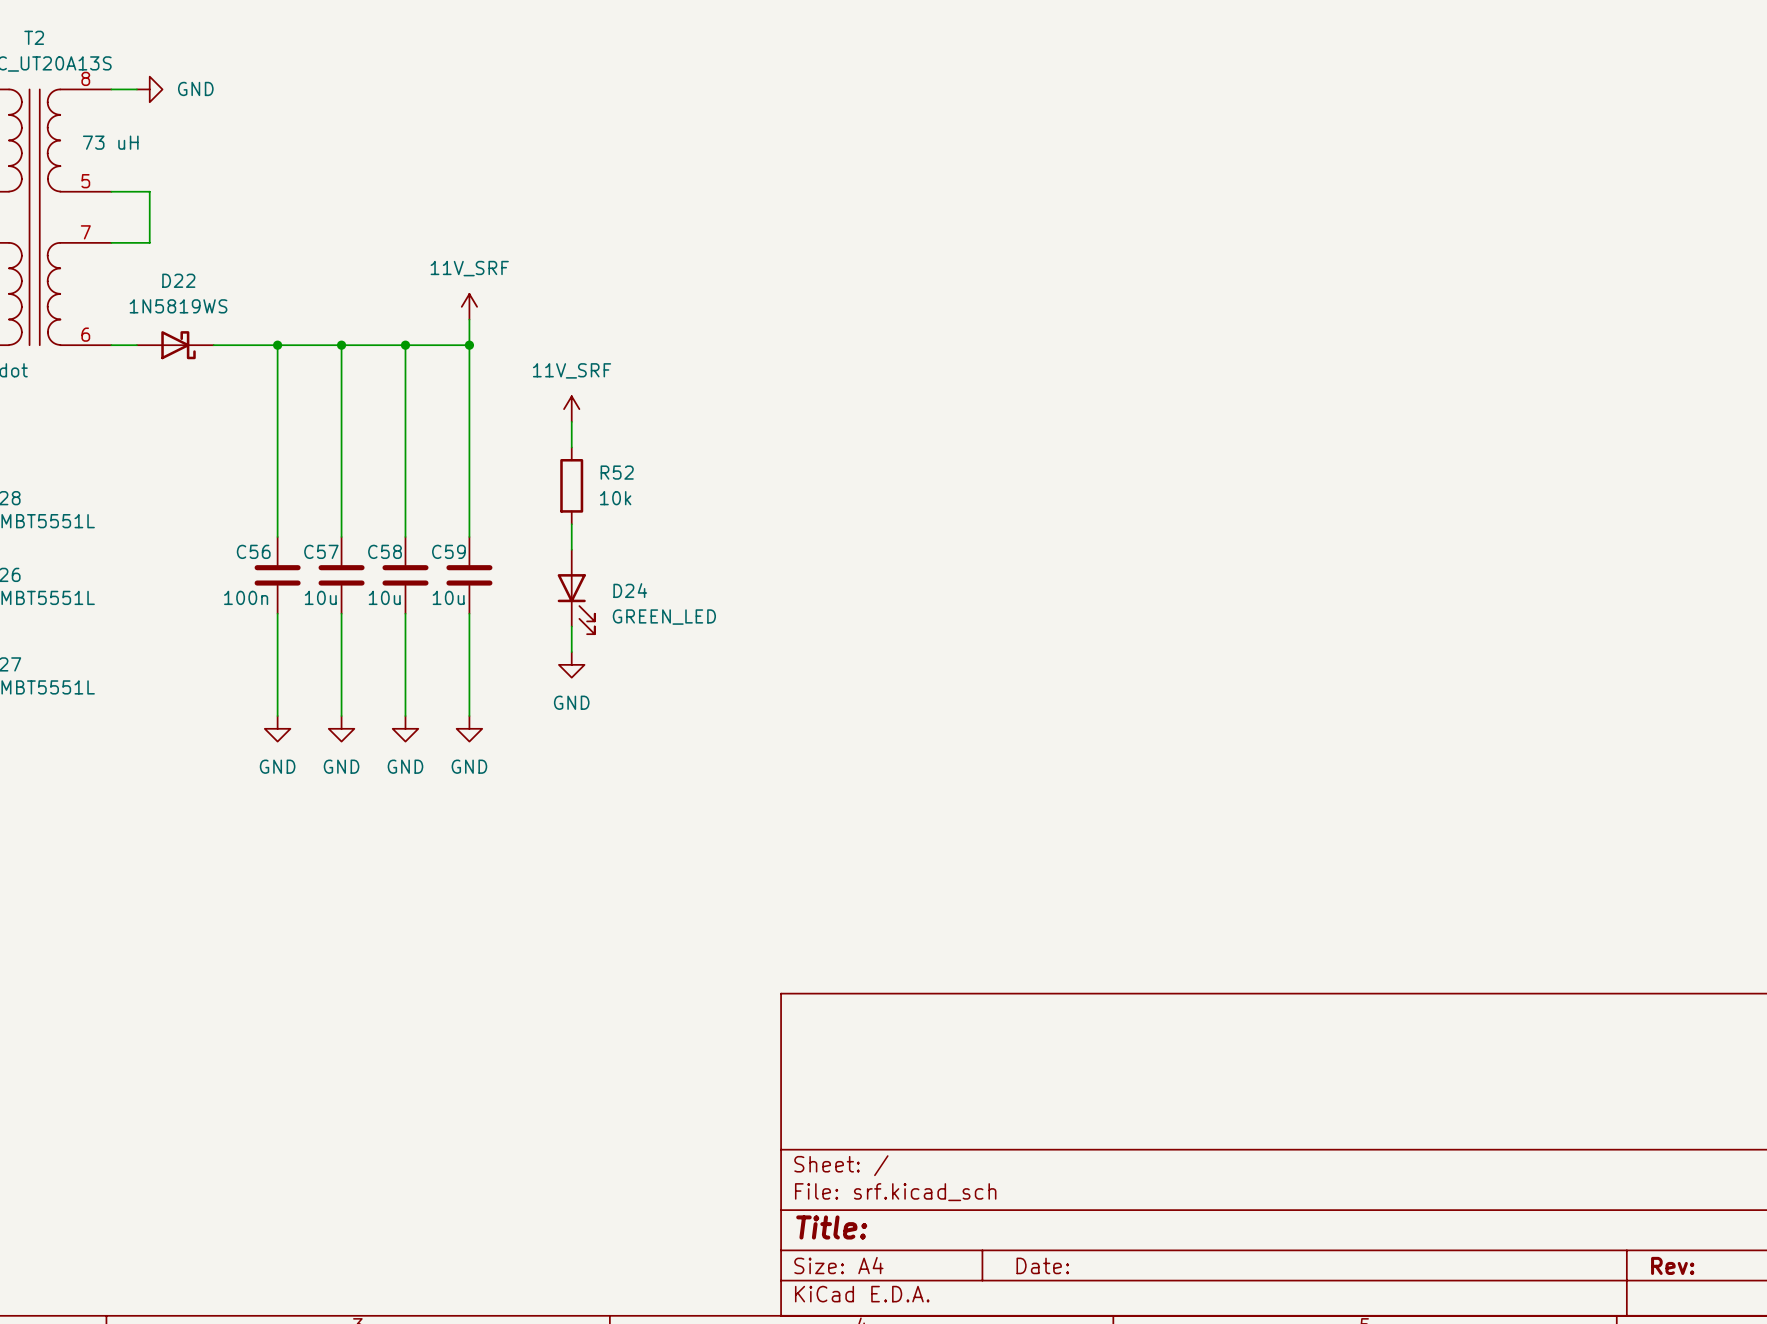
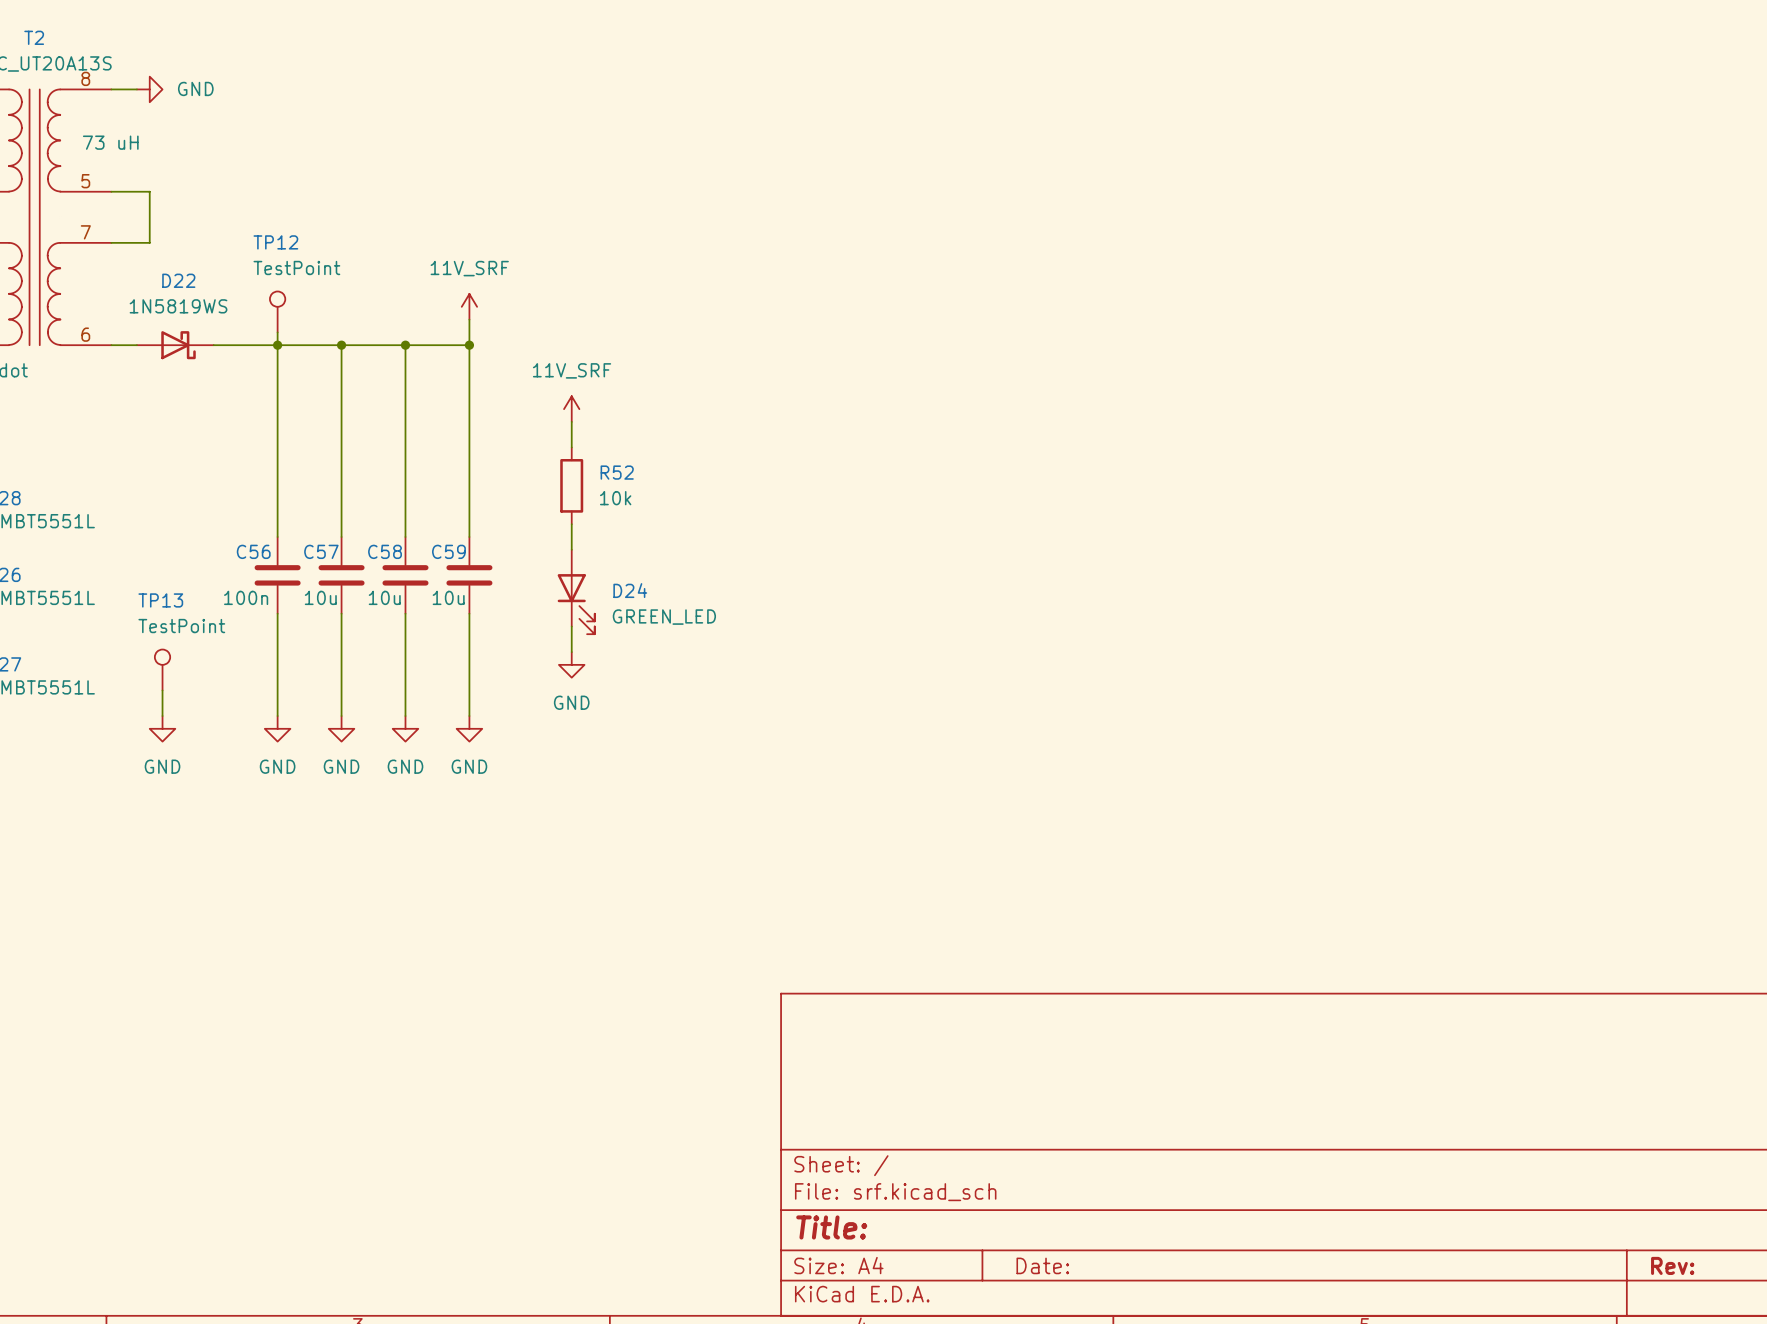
TP12: none -> TestPoint (277, 311)
wire: none -> (277, 332) (277, 345)
TP13: none -> TestPoint (162, 669)
wire: none -> (162, 690) (162, 716)
power symbol: none -> GND (162, 728)

